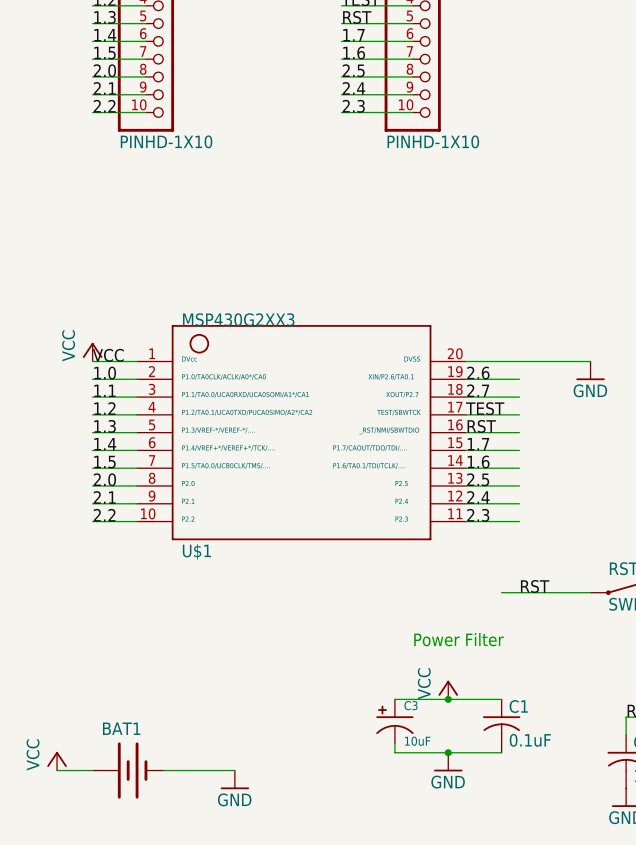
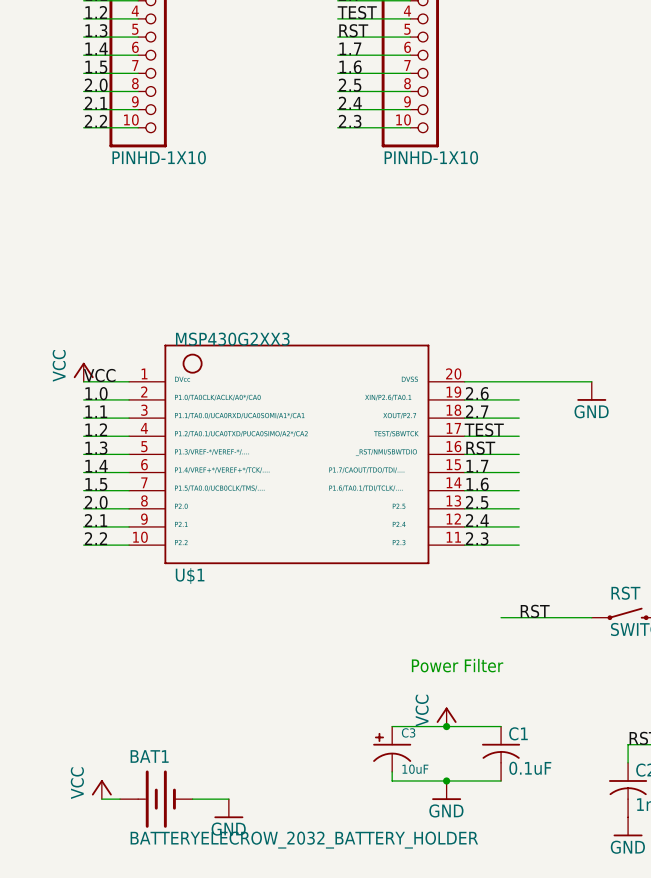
power symbol position: VCC (57, 761) -> VCC (101, 789)
wire: (57, 770) (92, 770) -> none
BAT1 position: (128, 770) -> (156, 799)
BAT1 value: none -> BATTERYELECROW_2032_BATTERY_HOLDER (304, 840)

